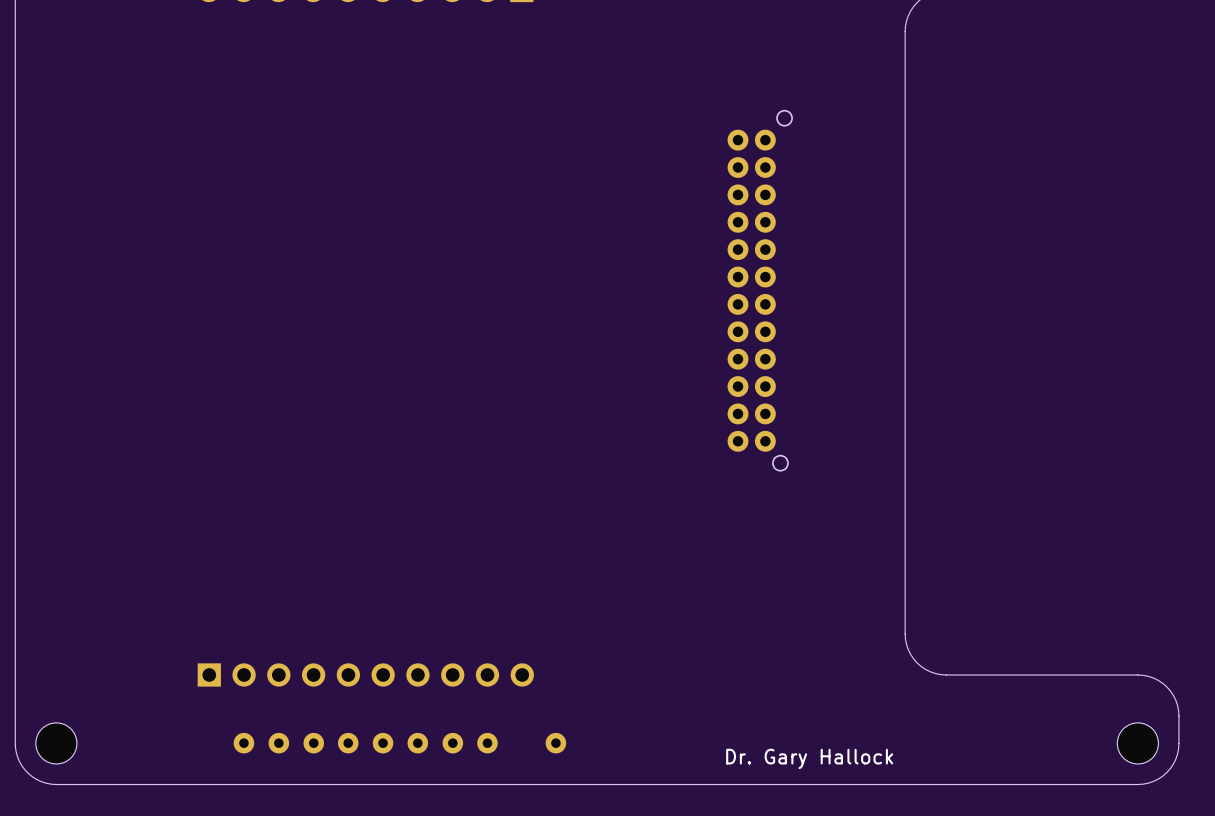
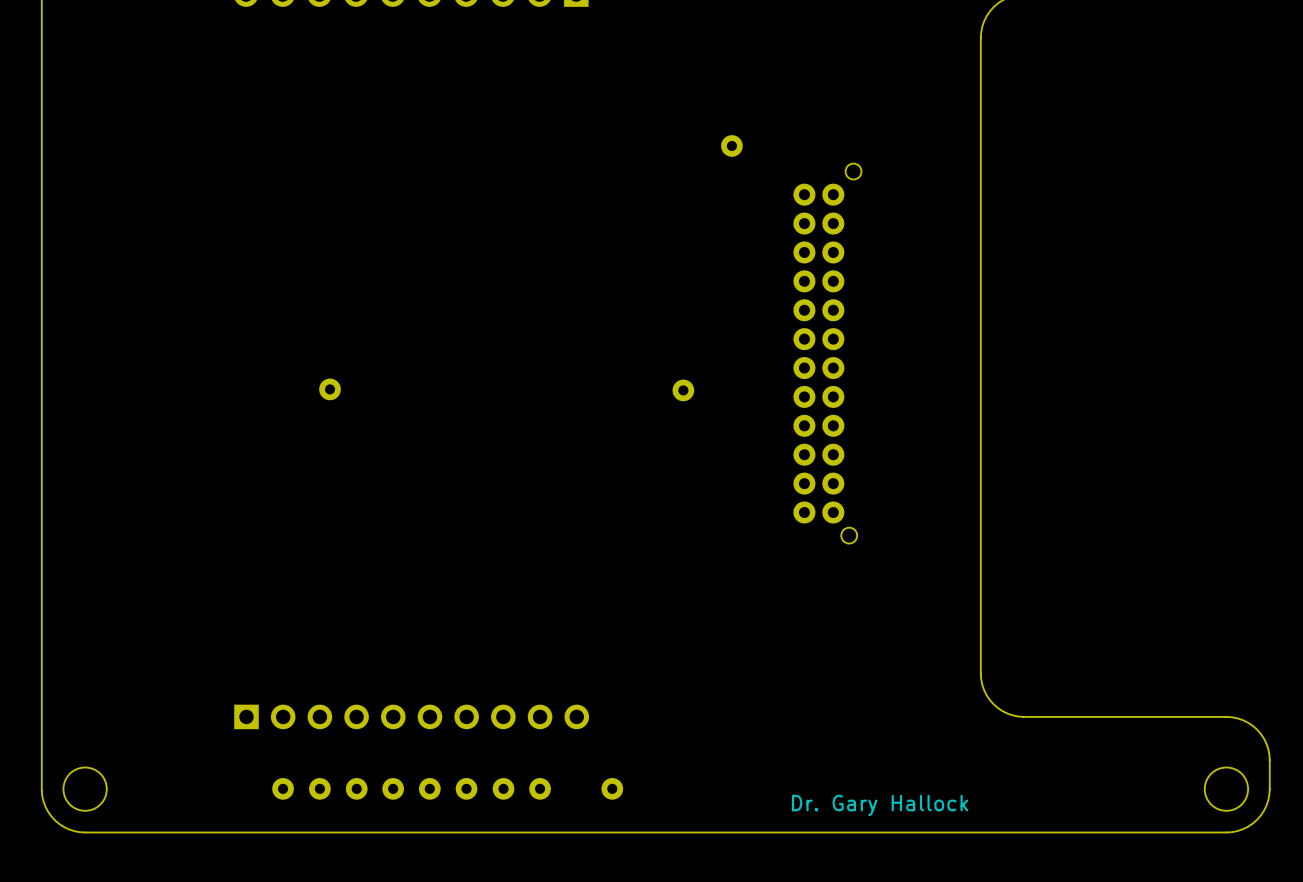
part: none -> (731, 145)
part position: (760, 290) -> (827, 353)
part: none -> (330, 389)
part: none -> (683, 390)

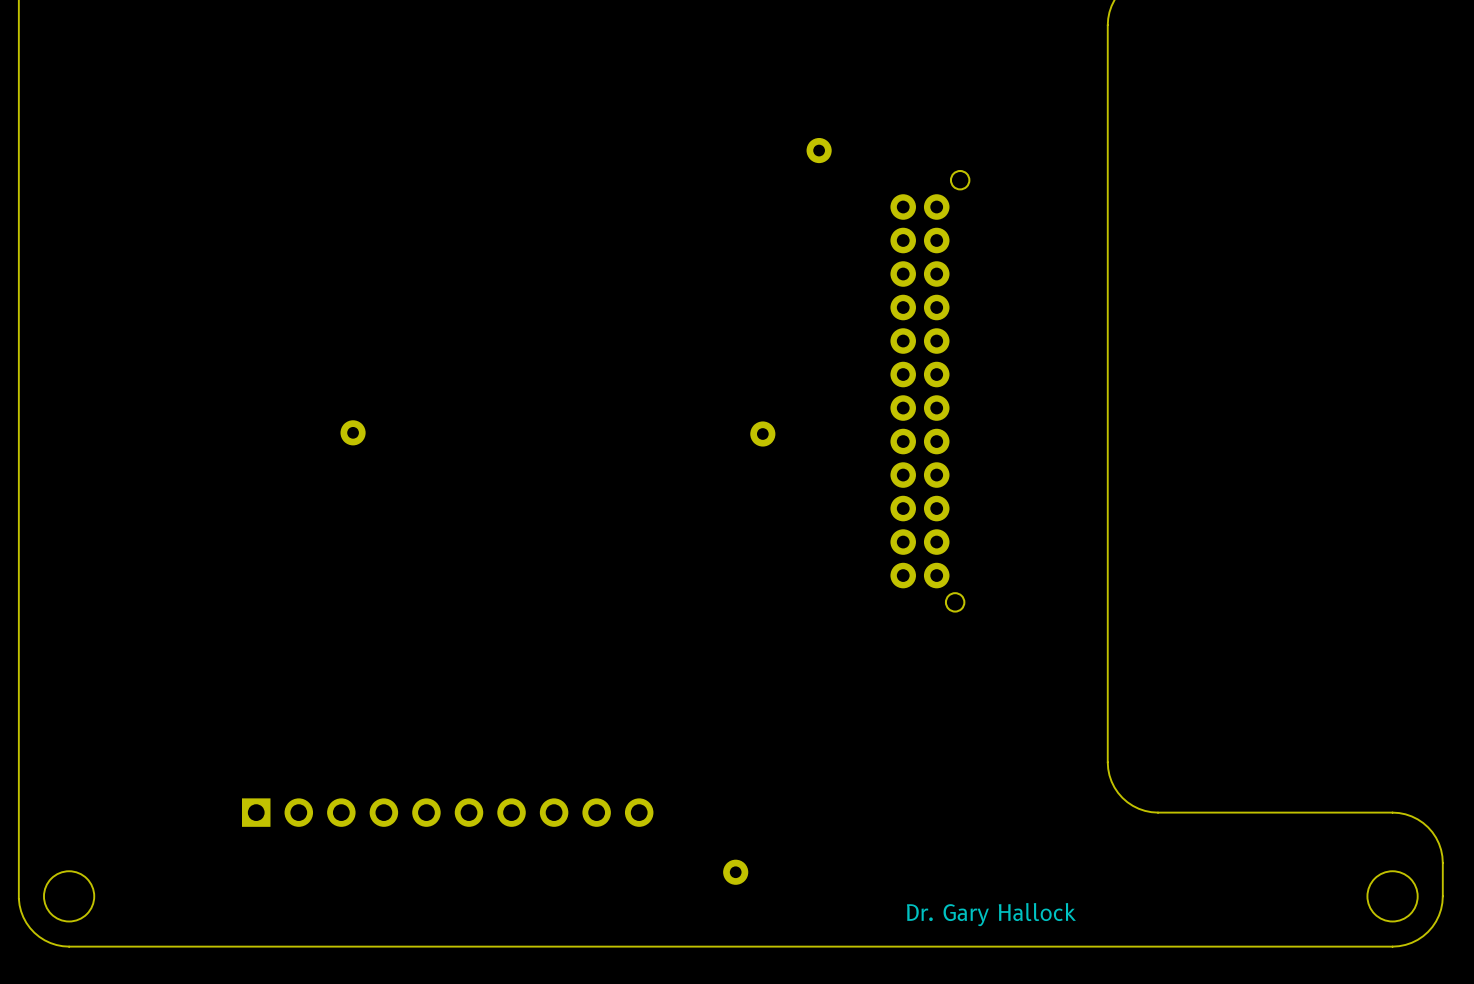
part: (283, 788) -> none
part: (319, 788) -> none
part: (356, 788) -> none
part: (393, 788) -> none
part: (429, 788) -> none
part: (466, 788) -> none
part: (503, 788) -> none
part: (540, 788) -> none
part position: (612, 788) -> (735, 872)

